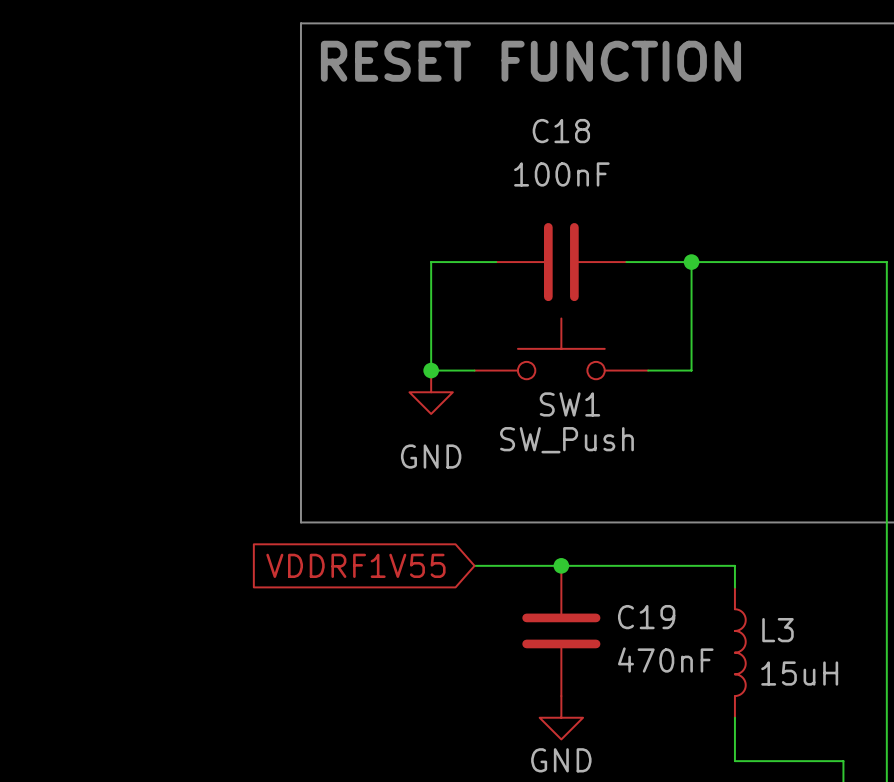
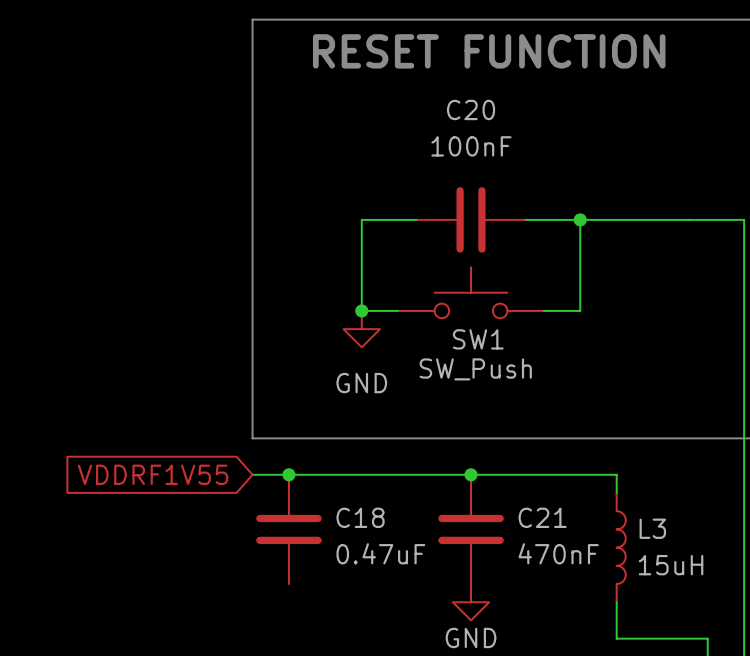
text position: RESET FUNCTION (530, 61) -> RESET FUNCTION (489, 51)
C18 name: C18 (561, 131) -> C20 (471, 109)
wire: none -> (252, 474) (398, 474)
junction: none -> (288, 474)
global label position: VDDRF1V55 (355, 565) -> VDDRF1V55 (153, 474)
C19 name: C19 (646, 617) -> C21 (542, 517)
C18: none -> 0.47uF (288, 529)

